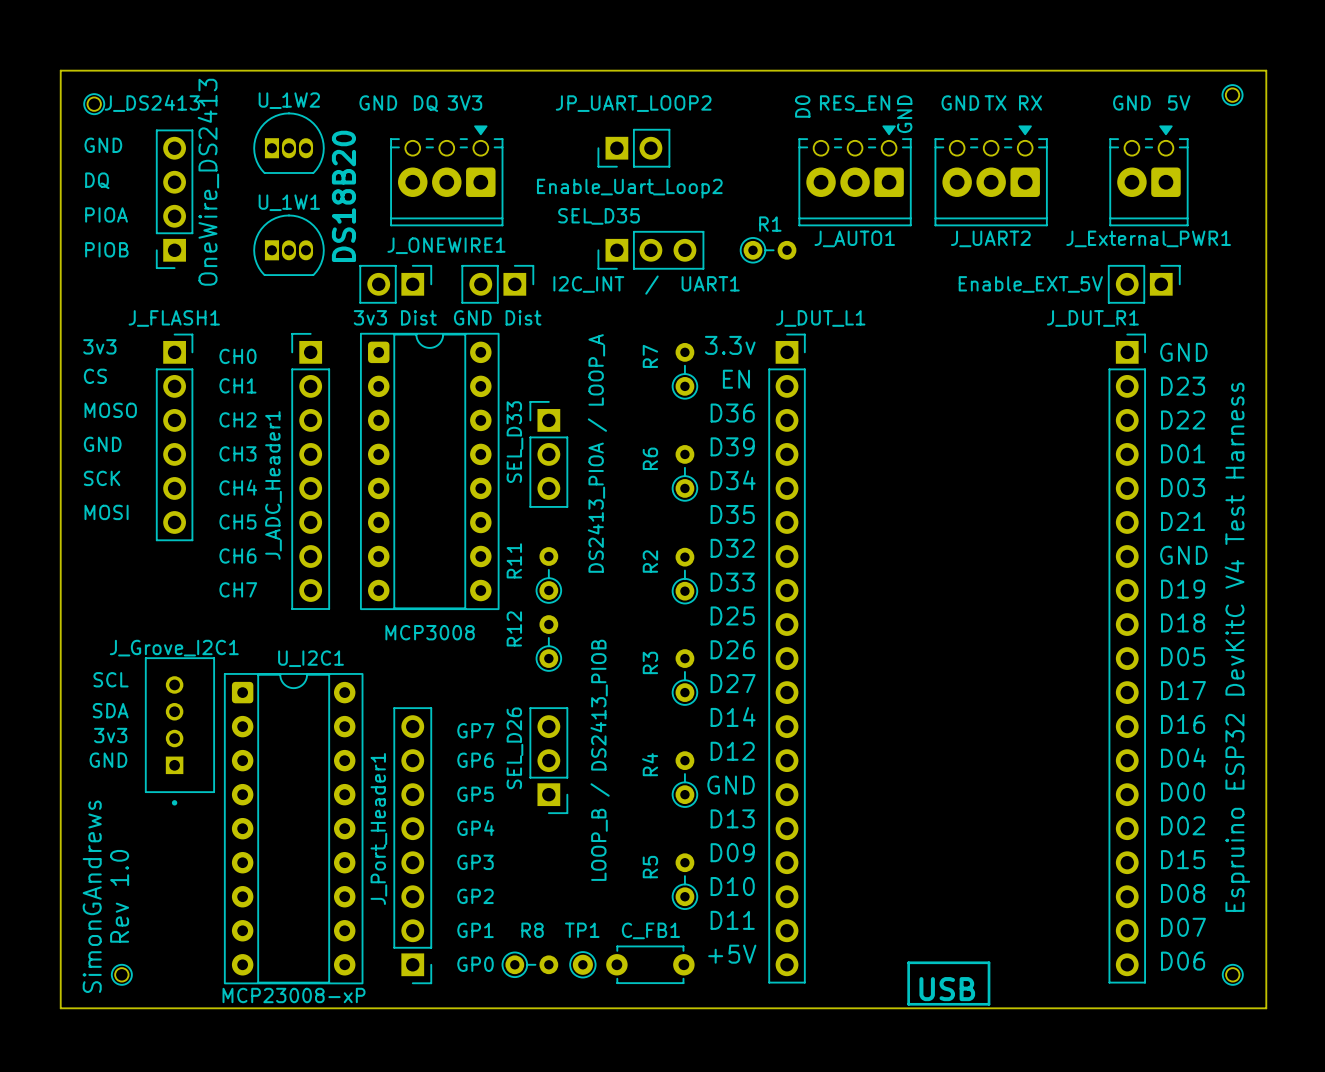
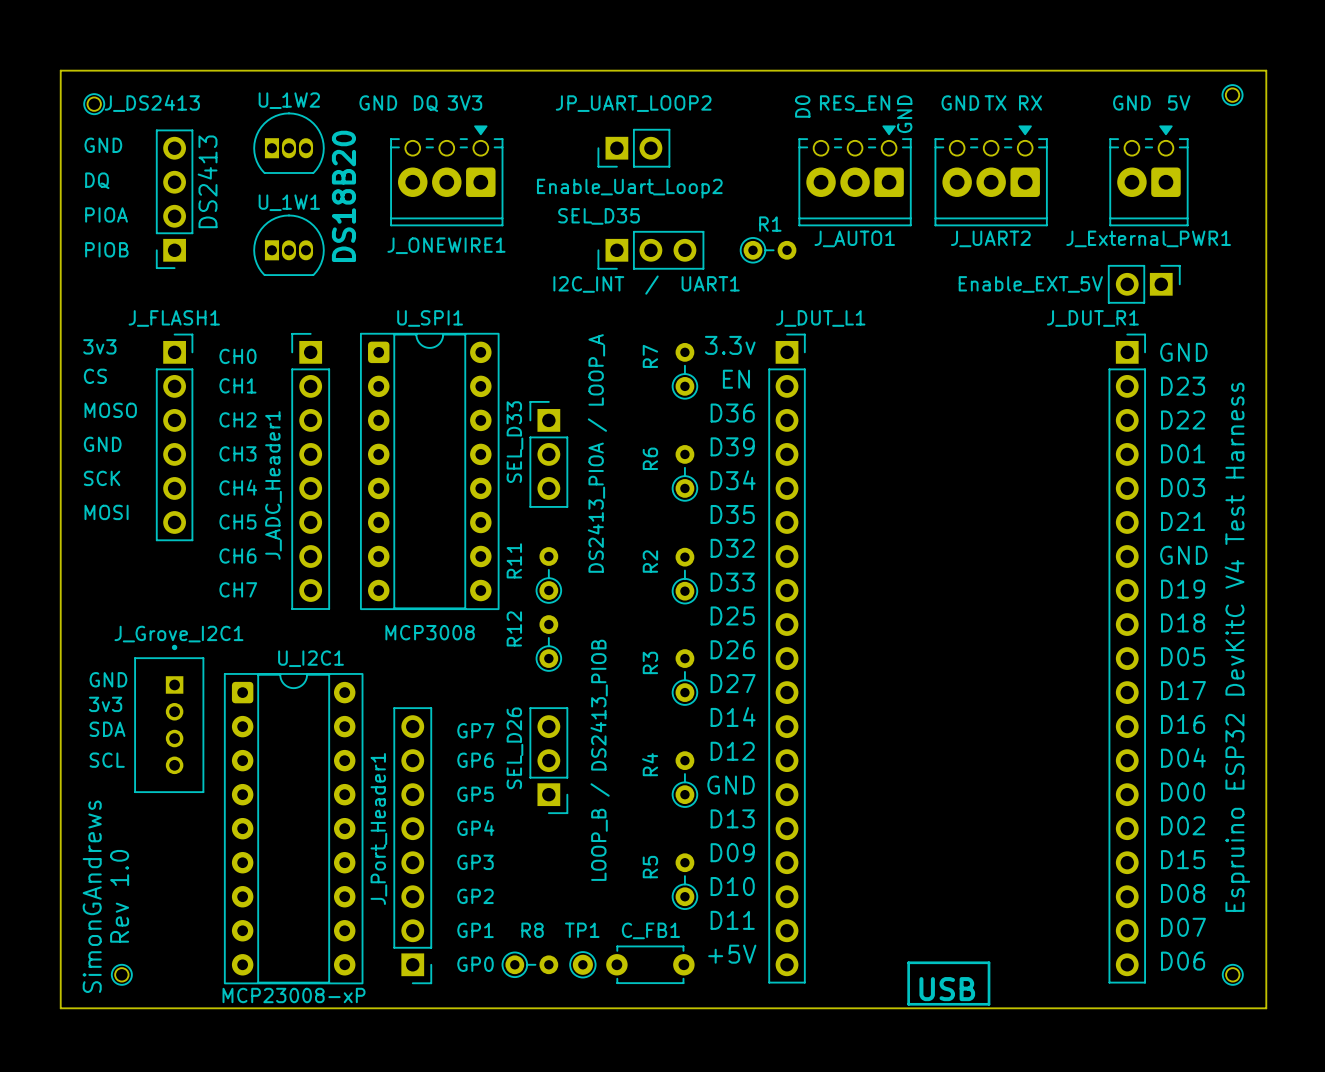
J_DS2413 text: OneWire_DS2413 (208, 182) -> DS2413 (207, 181)
part: 3v3 Dist (395, 284) -> none
part: GND Dist (497, 284) -> none
U_SPI1 name: none -> U_SPI1 (430, 318)
text: SCL (111, 679) -> GND (108, 679)
text: SDA (110, 710) -> 3v3 (105, 704)
J_Grove_I2C1 rotation: 0° (179, 731) -> 180° (169, 718)
text: 3v3 (110, 735) -> SDA (107, 729)
text: GND (108, 760) -> SCL (107, 760)

